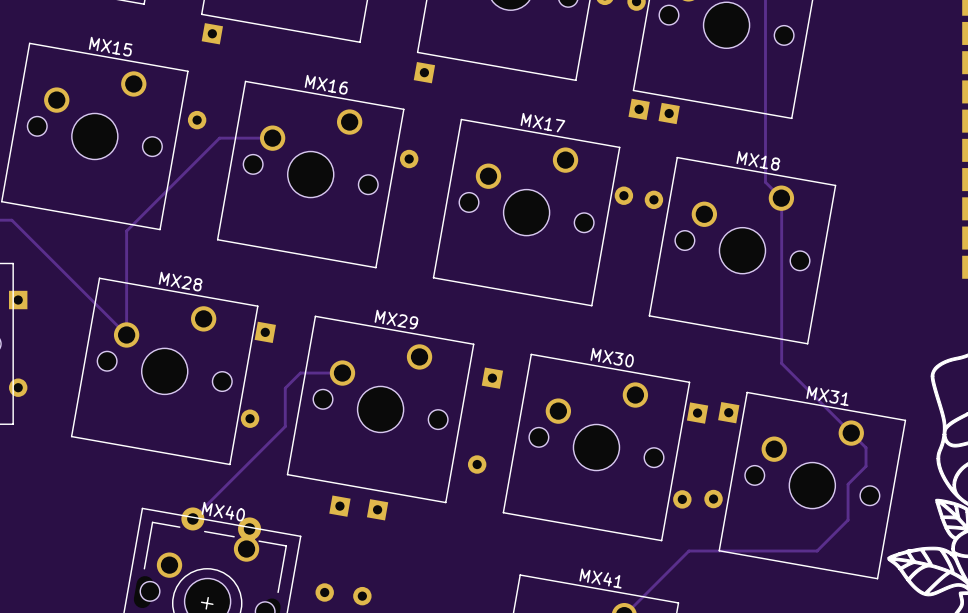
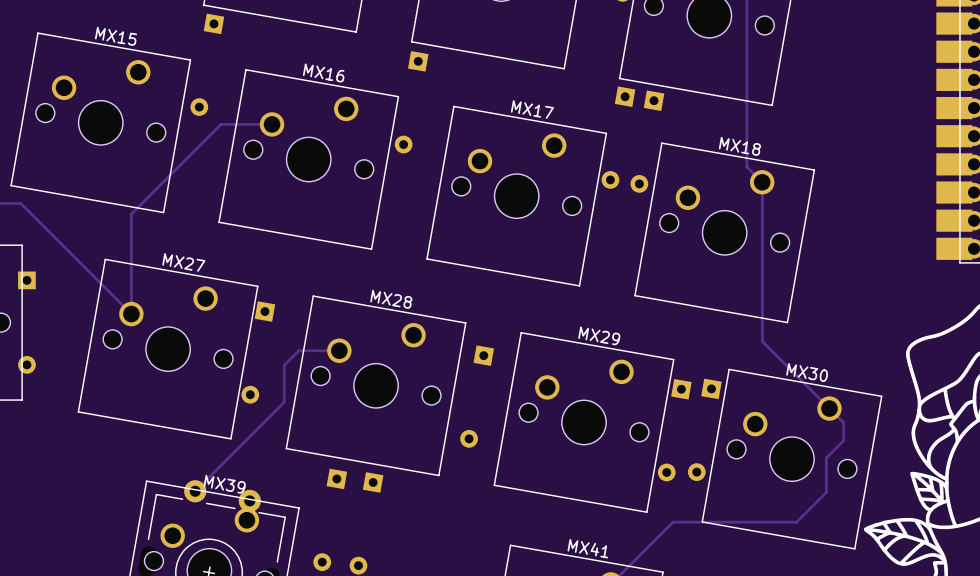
MX28 name: MX28 (180, 281) -> MX27 (183, 262)
MX29 name: MX29 (396, 319) -> MX28 (391, 299)
MX30 name: MX30 (612, 357) -> MX29 (599, 335)
MX31 name: MX31 (827, 395) -> MX30 (807, 372)
MX40 name: MX40 (223, 511) -> MX39 (224, 484)

